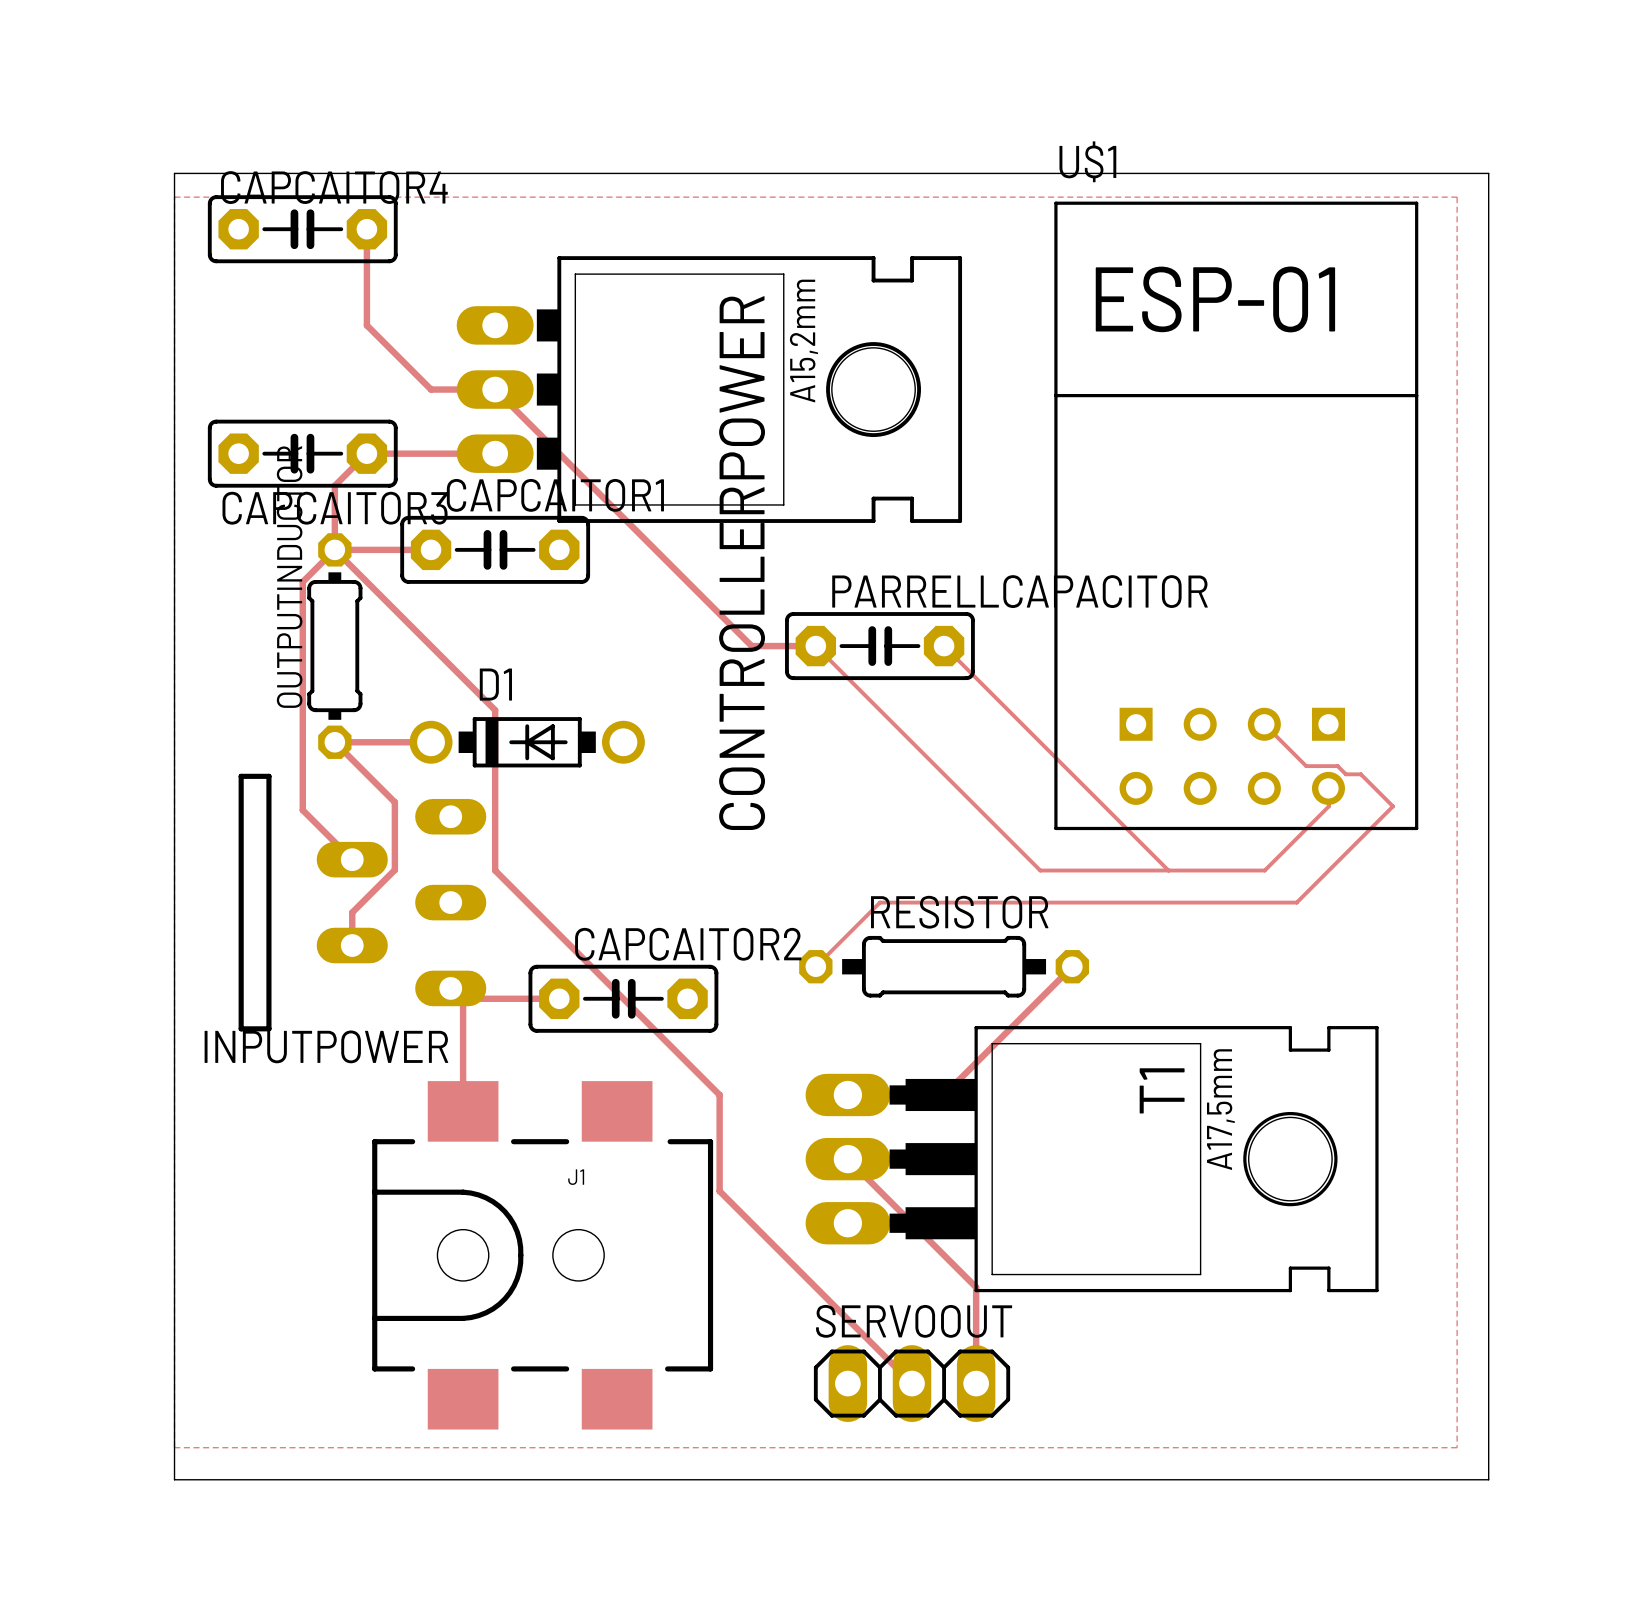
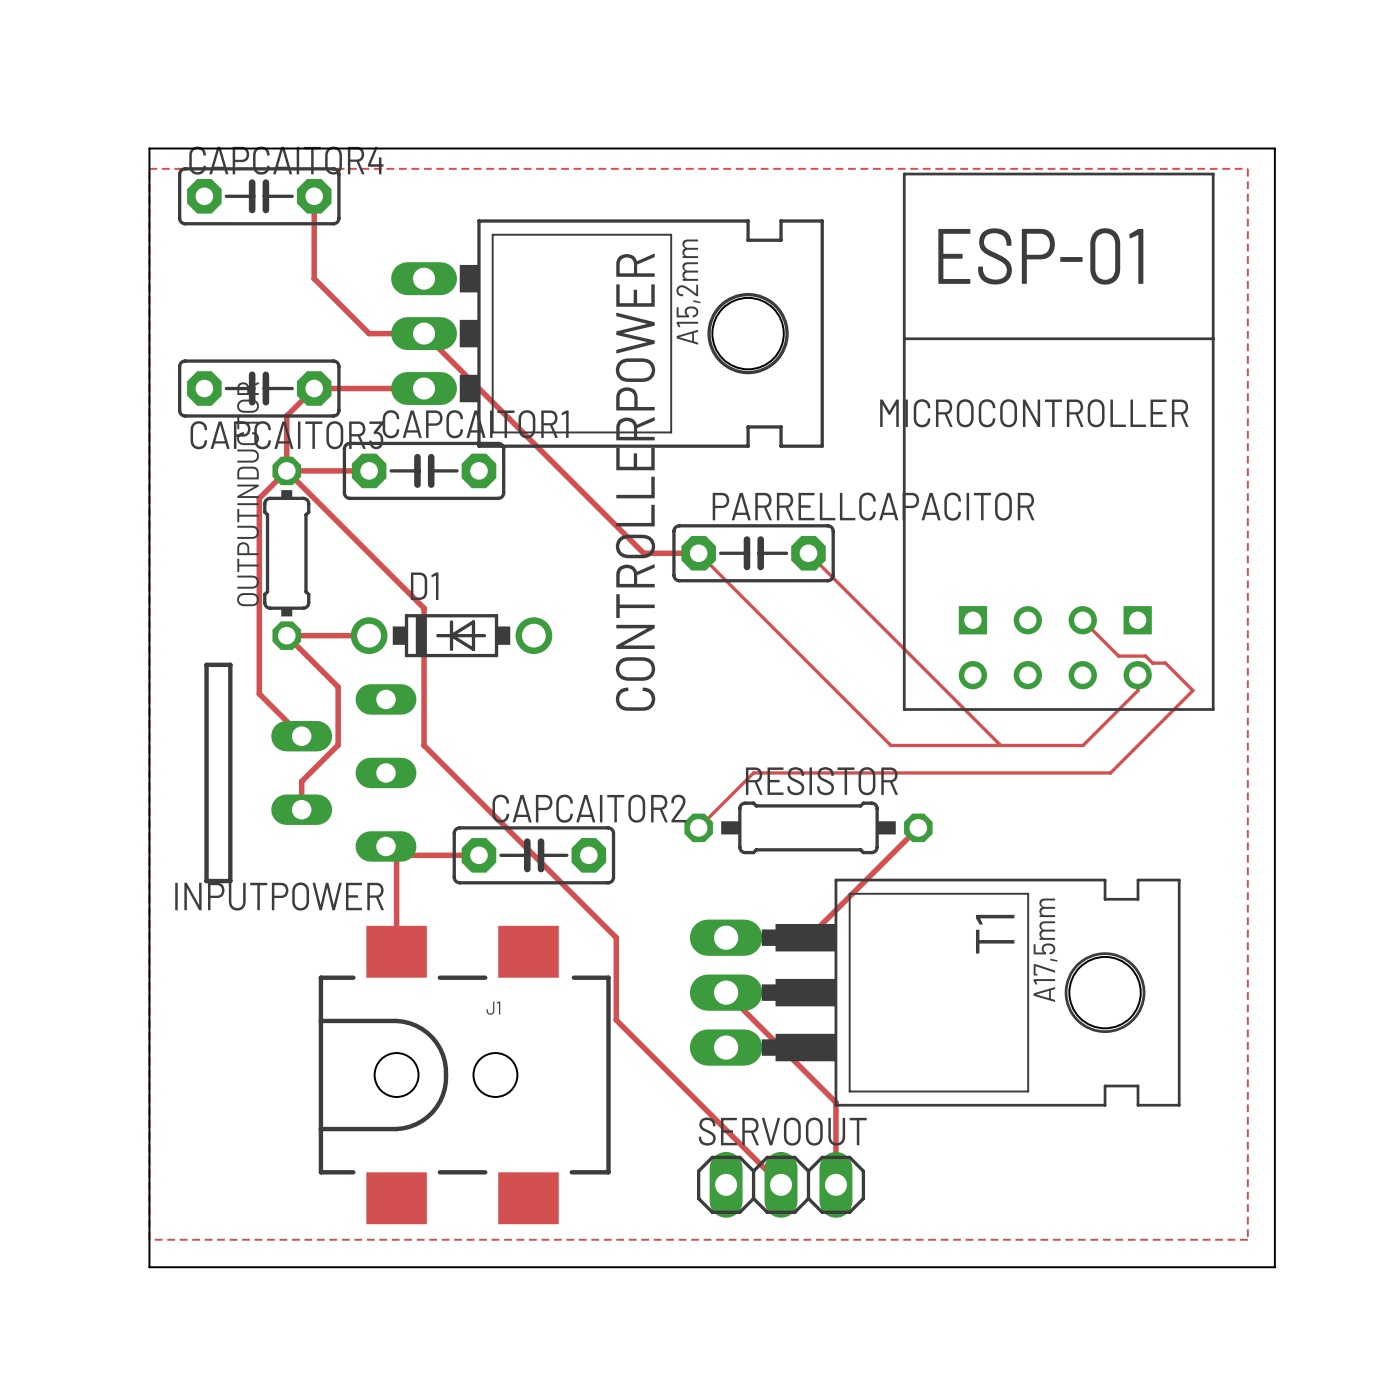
U$1 name: U$1 (1087, 161) -> MICROCONTROLLER (1034, 413)

